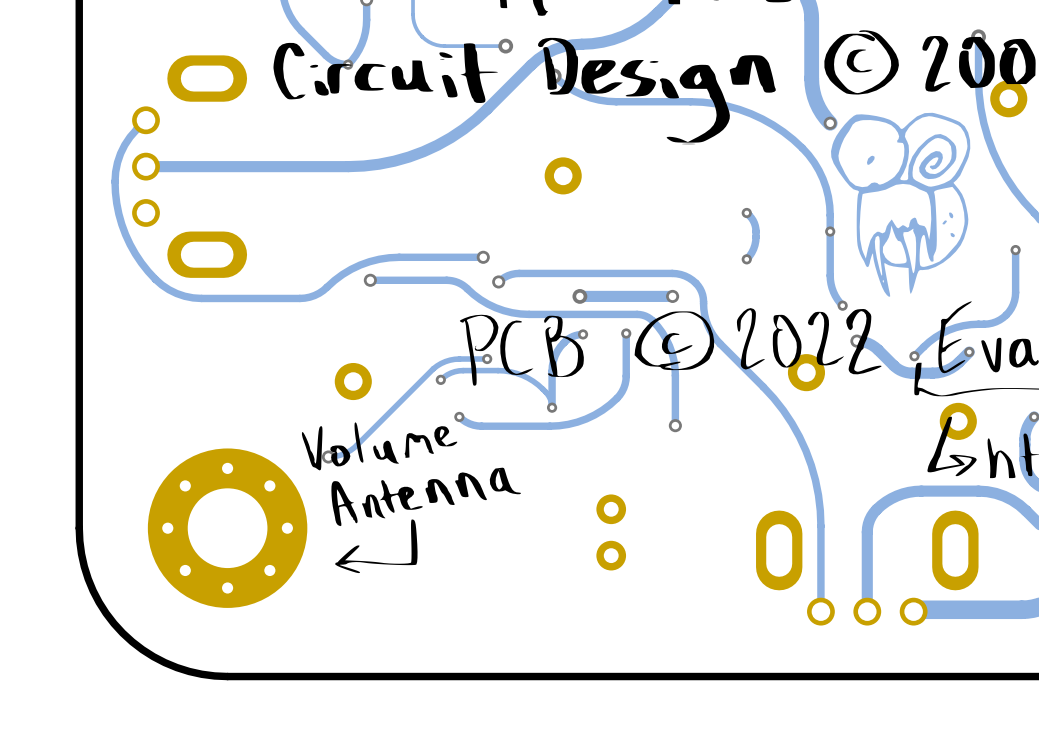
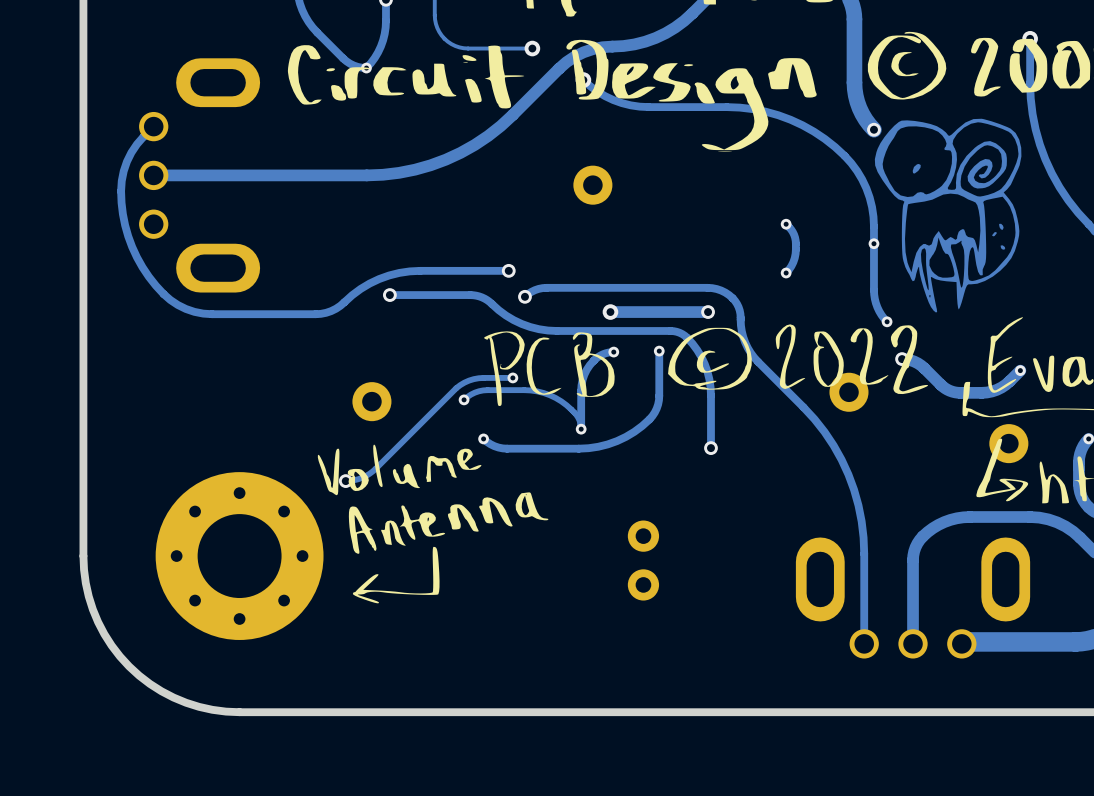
part: (1008, 98) -> none
track: (1015, 250) (1015, 296) (1013, 304) (1006, 314) (992, 323) (963, 325) (948, 330) (929, 341) (914, 356) -> none
via: (1015, 250) -> none
via: (914, 356) -> none

